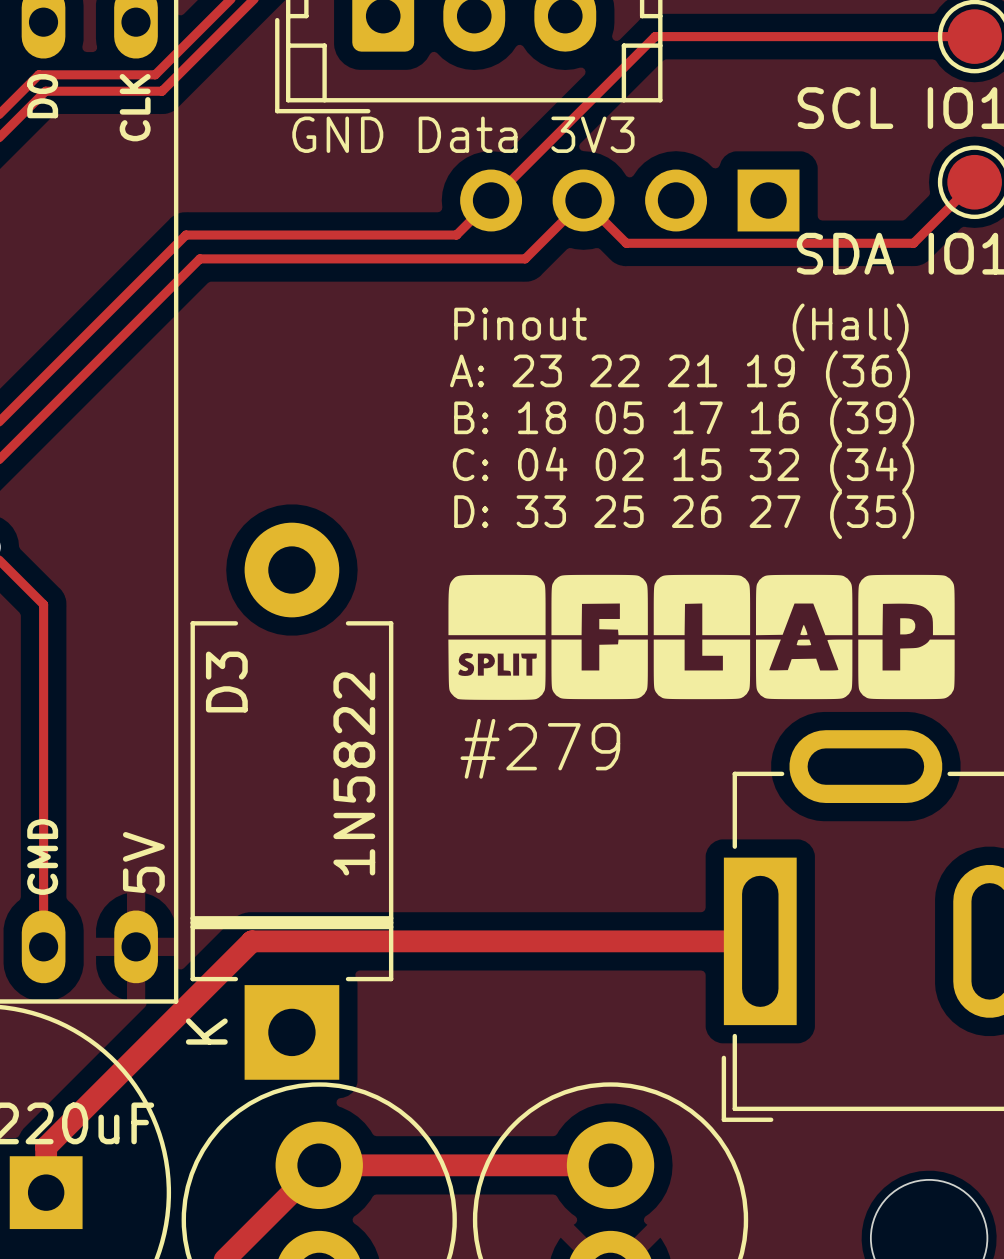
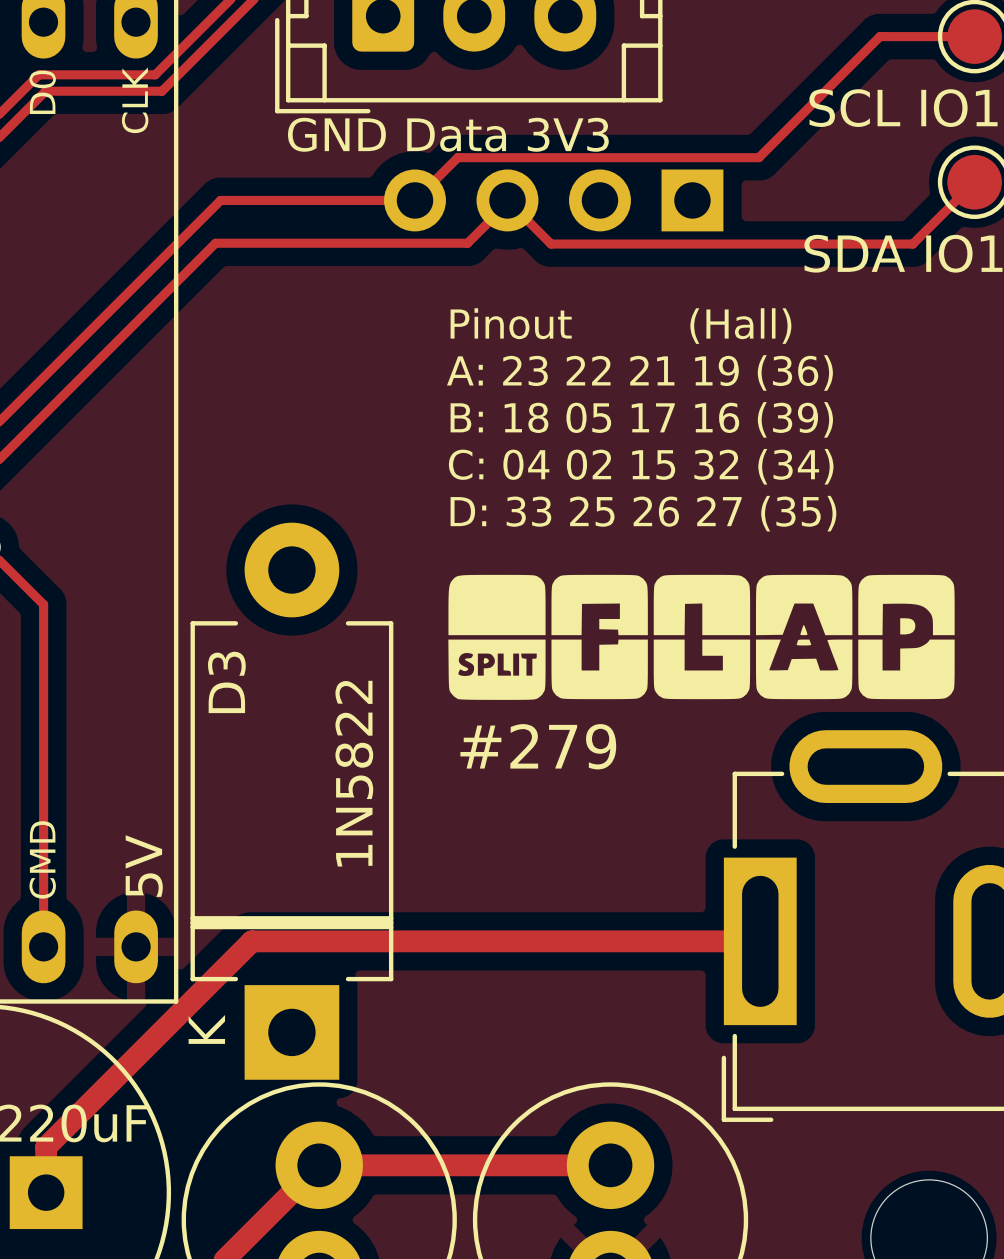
track: (879, 36) (655, 36) (456, 235) (185, 235) -> (879, 36) (758, 157) (457, 157) (415, 200) (220, 200) (185, 235)
part position: (629, 200) -> (553, 200)
track: (913, 243) (626, 243) (583, 200) (525, 258) (199, 258) -> (913, 243) (551, 244) (507, 200) (507, 203) (467, 243) (215, 243) (199, 258)

